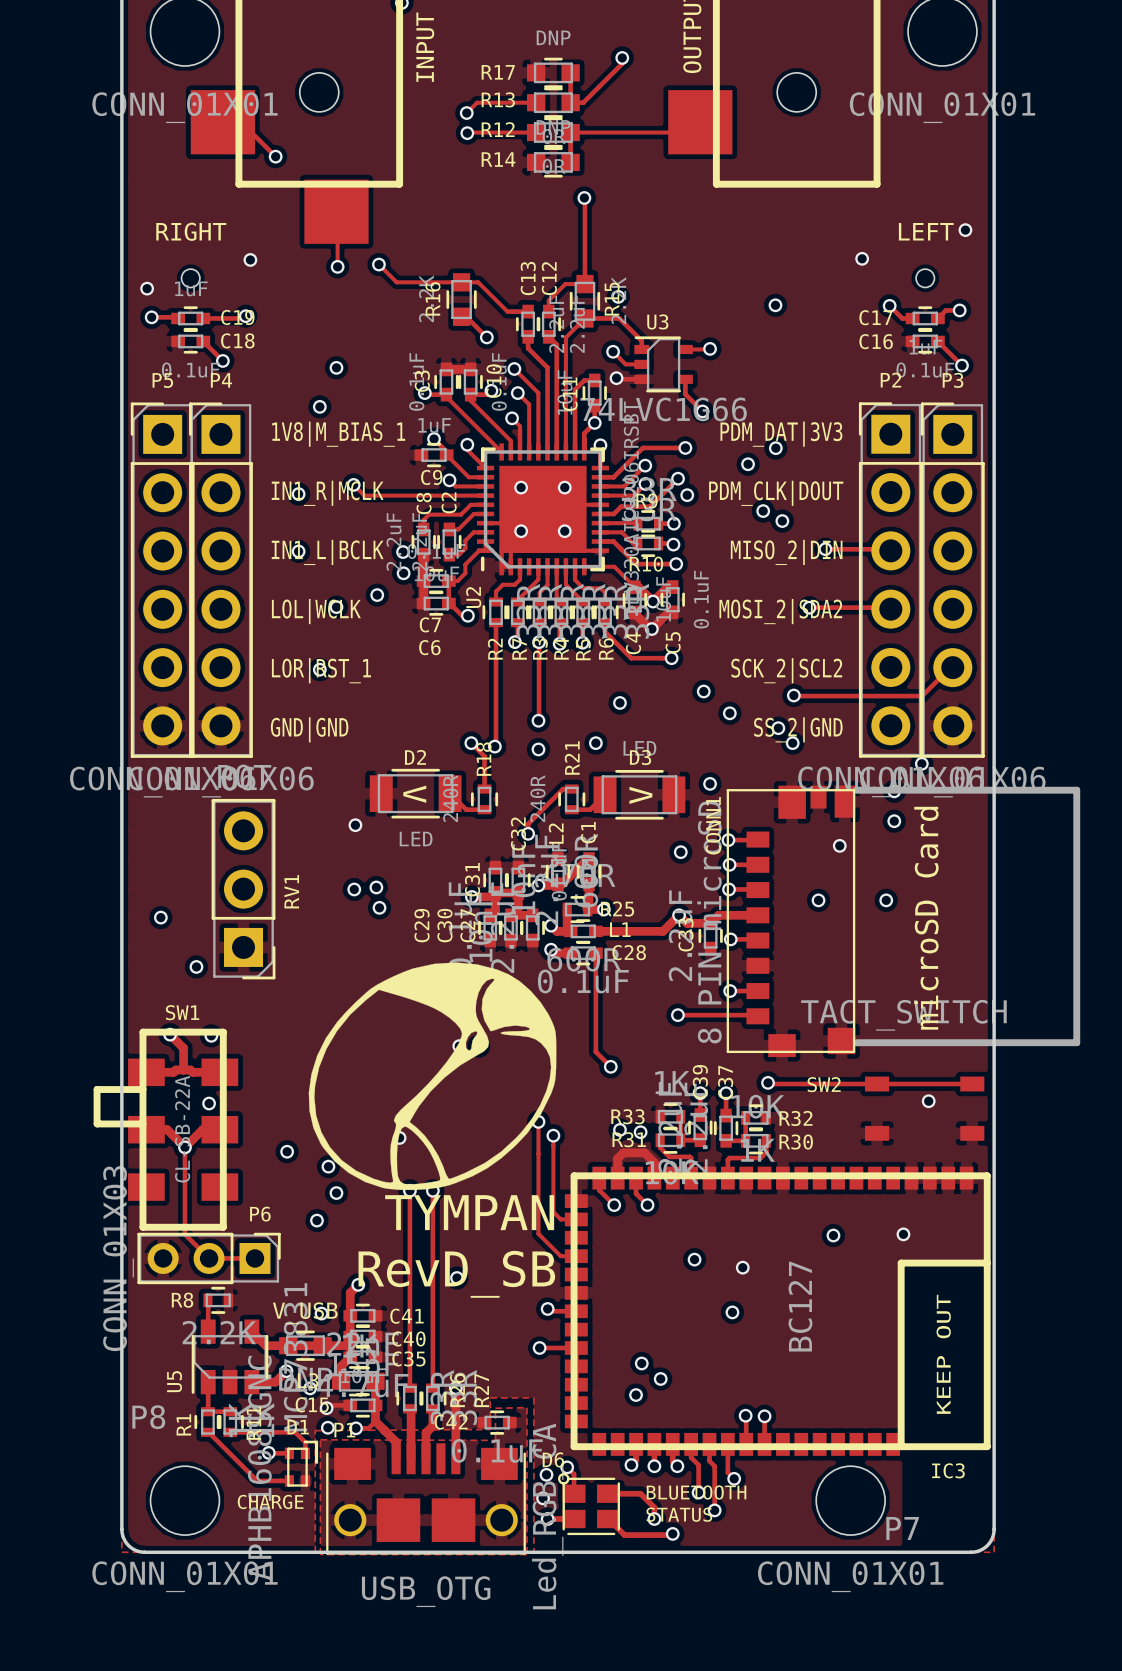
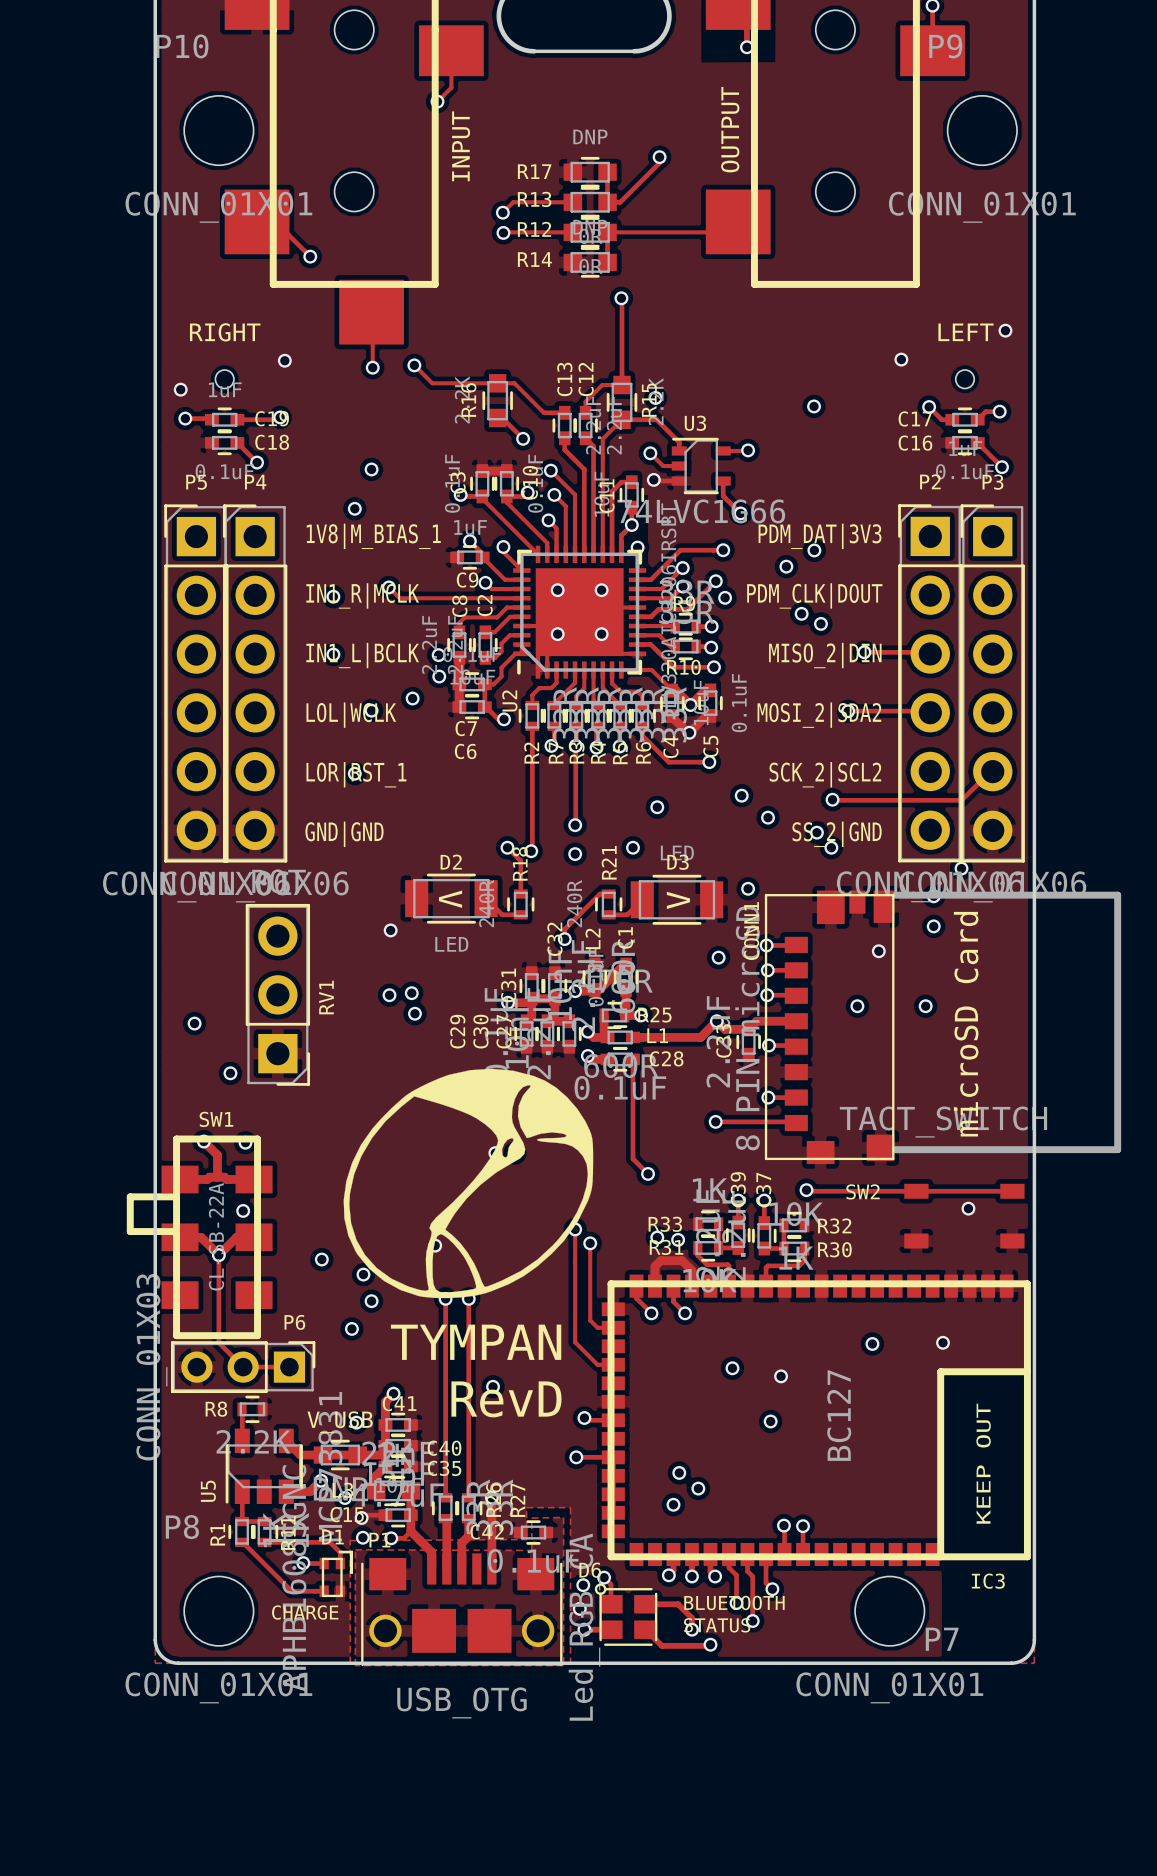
text position: TYMPAN (469, 1212) -> TYMPAN (476, 1342)
text: RevD_SB (456, 1274) -> RevD (506, 1399)
C41 name position: C41 (406, 1316) -> C41 (399, 1403)

